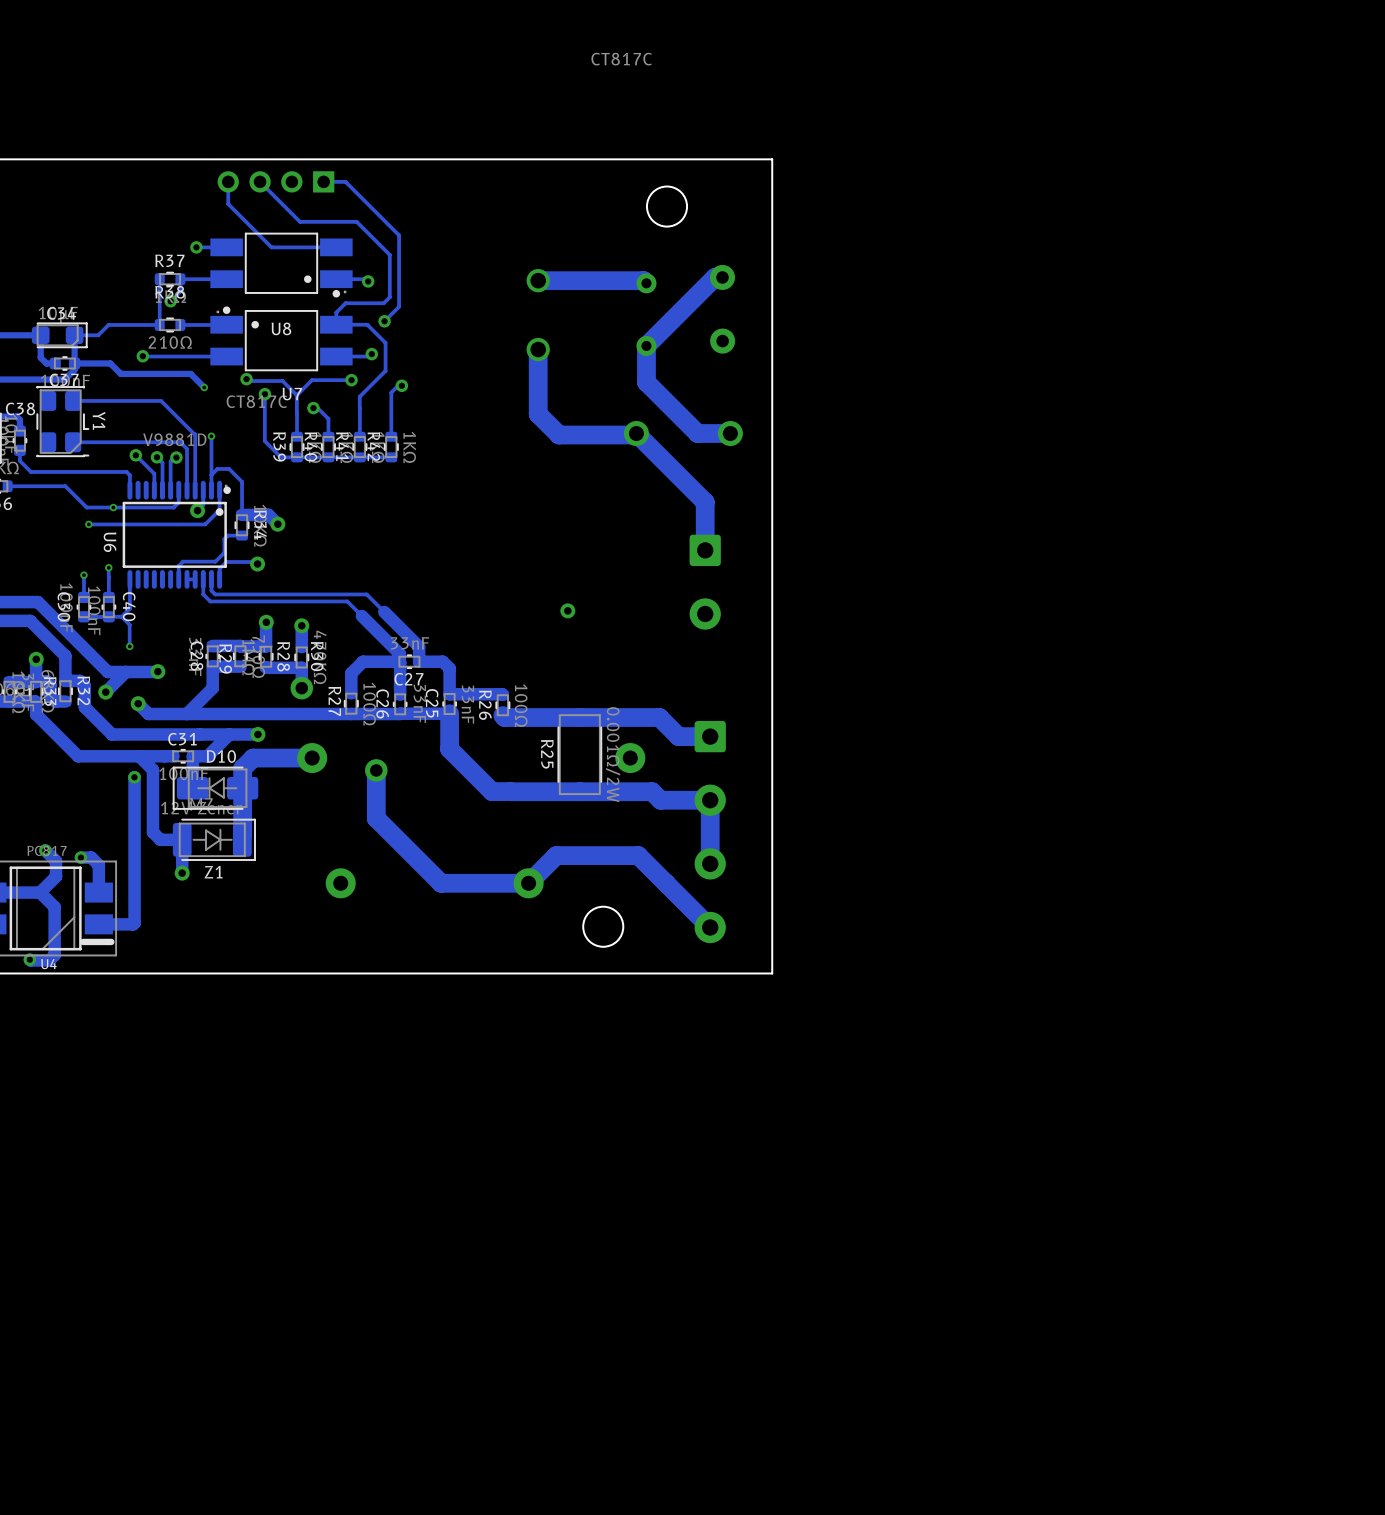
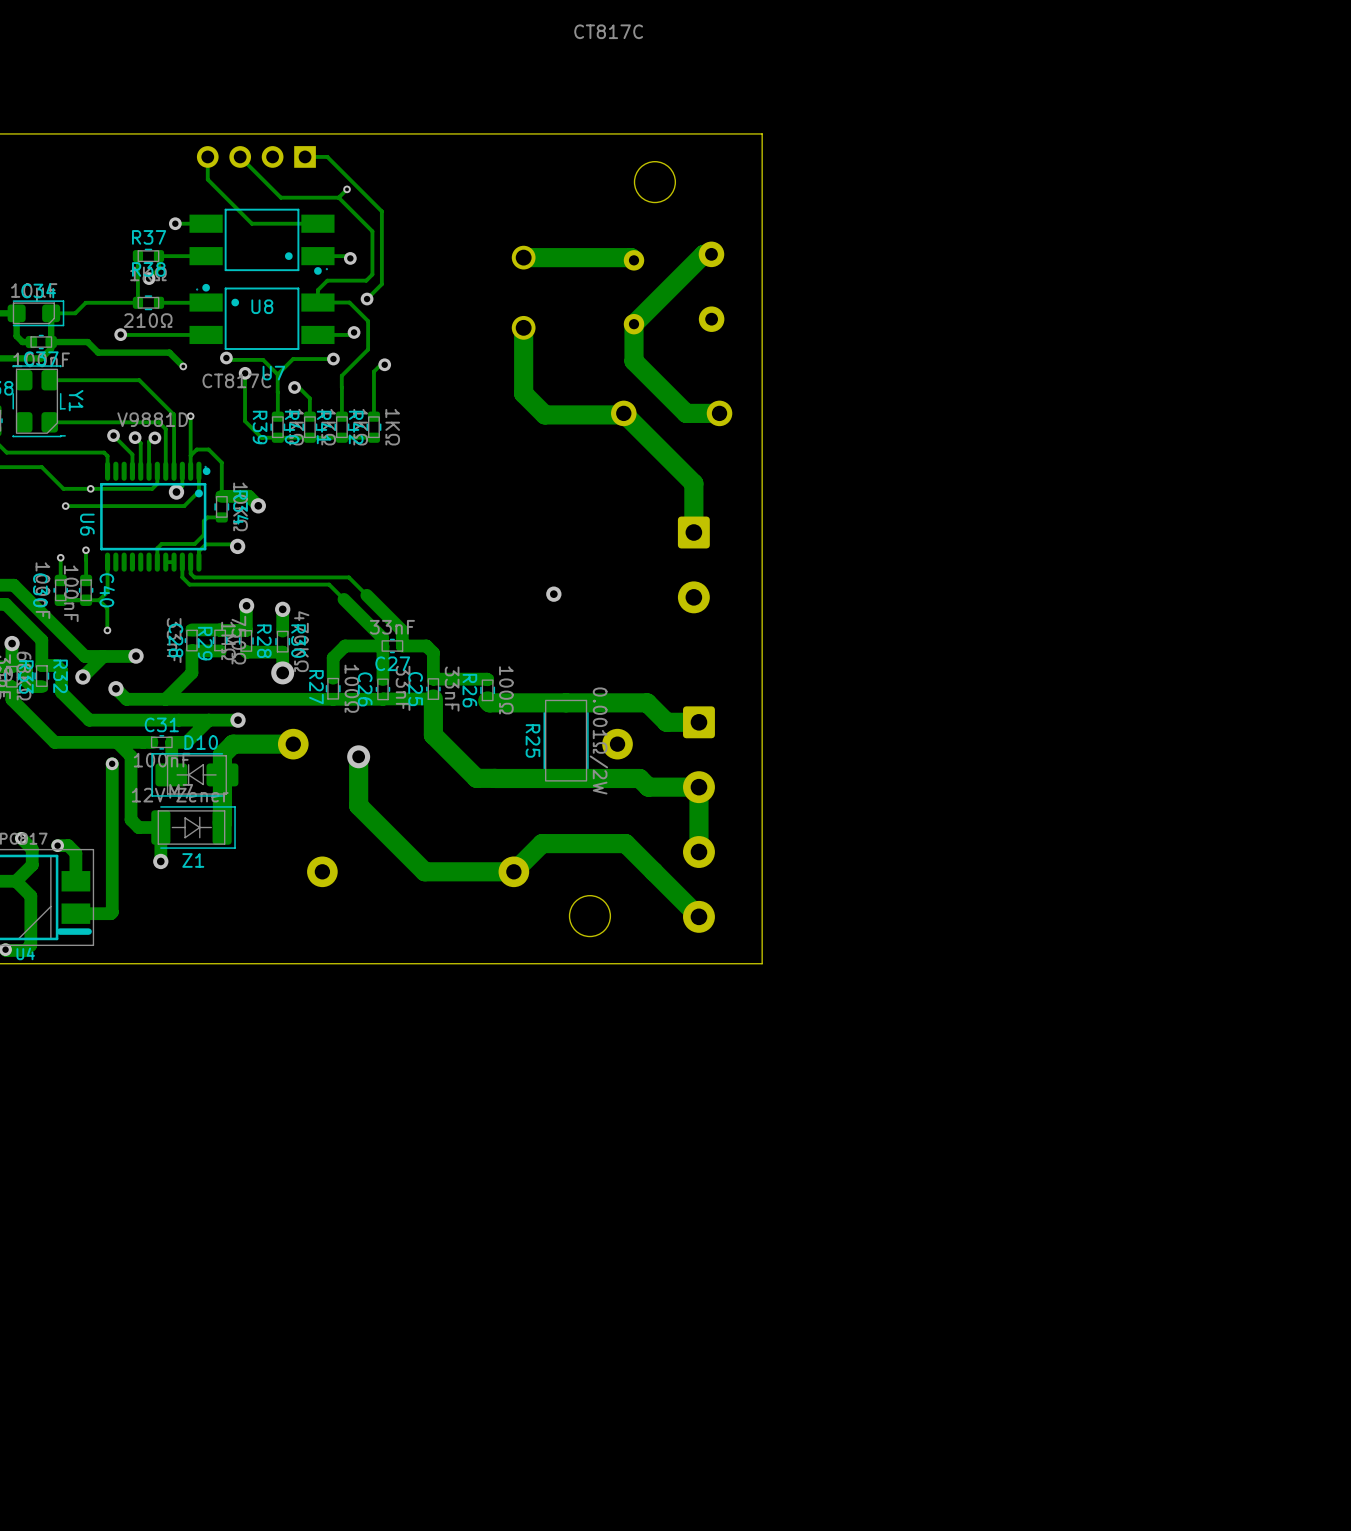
track: none -> (347, 189) (338, 197)
via: none -> (347, 189)

